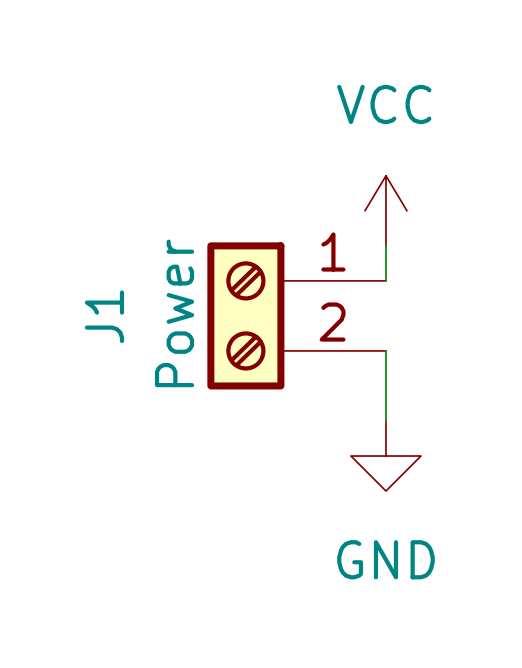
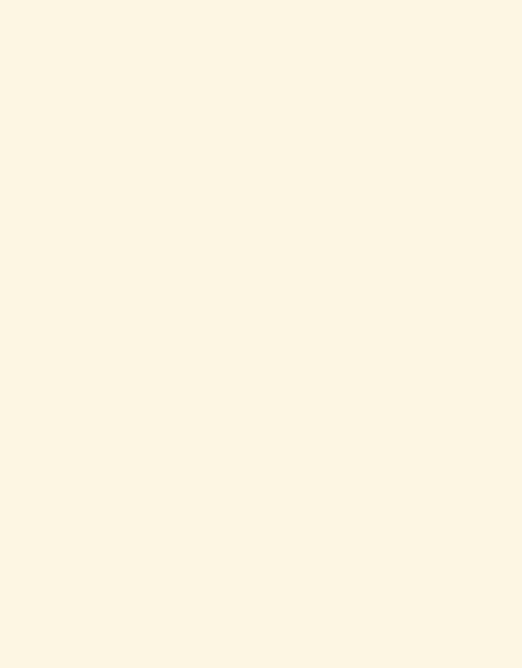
power symbol: VCC (385, 210) -> none
wire: (385, 245) (385, 280) -> none
J1: Power (296, 315) -> none
wire: (385, 350) (385, 420) -> none
power symbol: GND (385, 456) -> none

